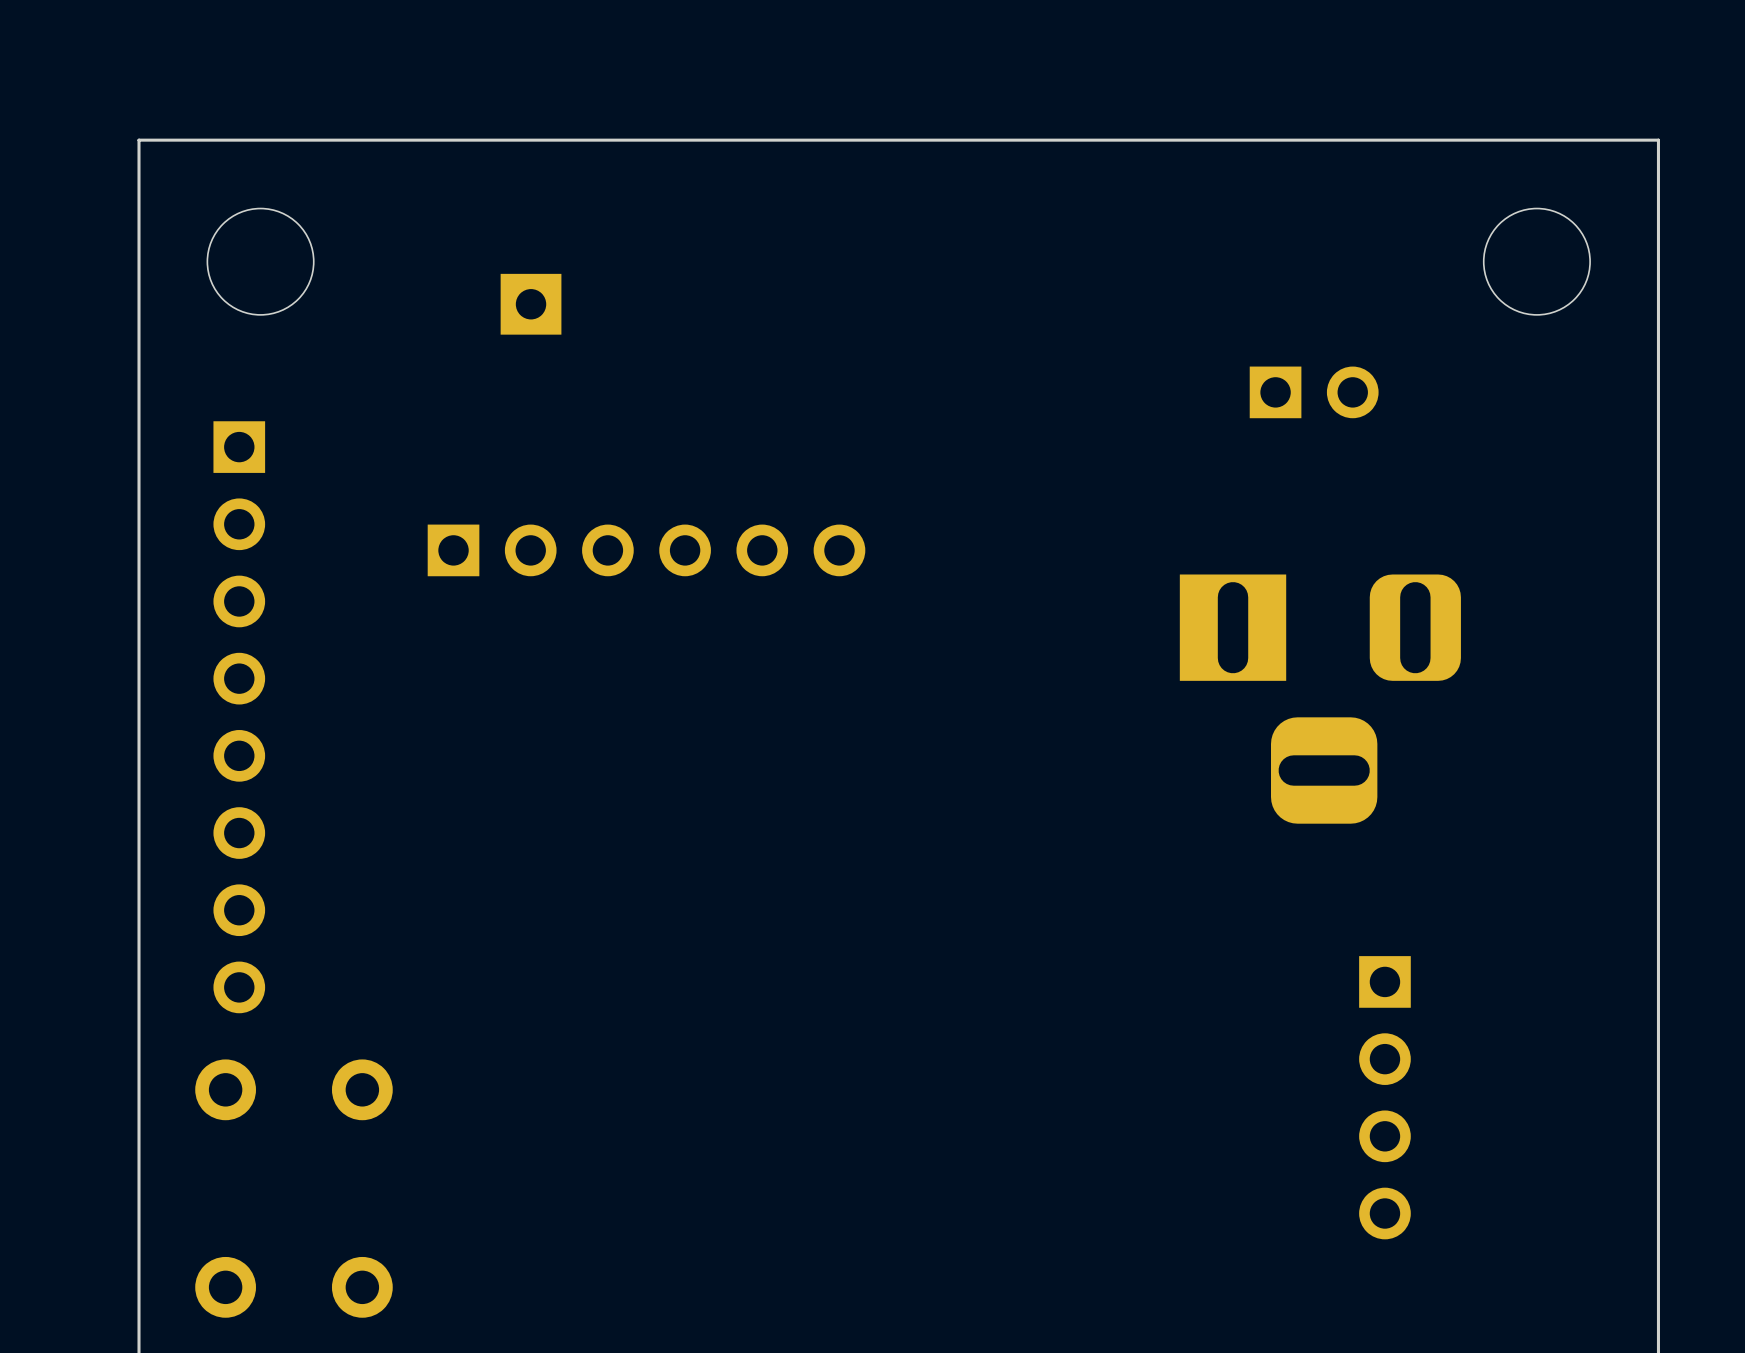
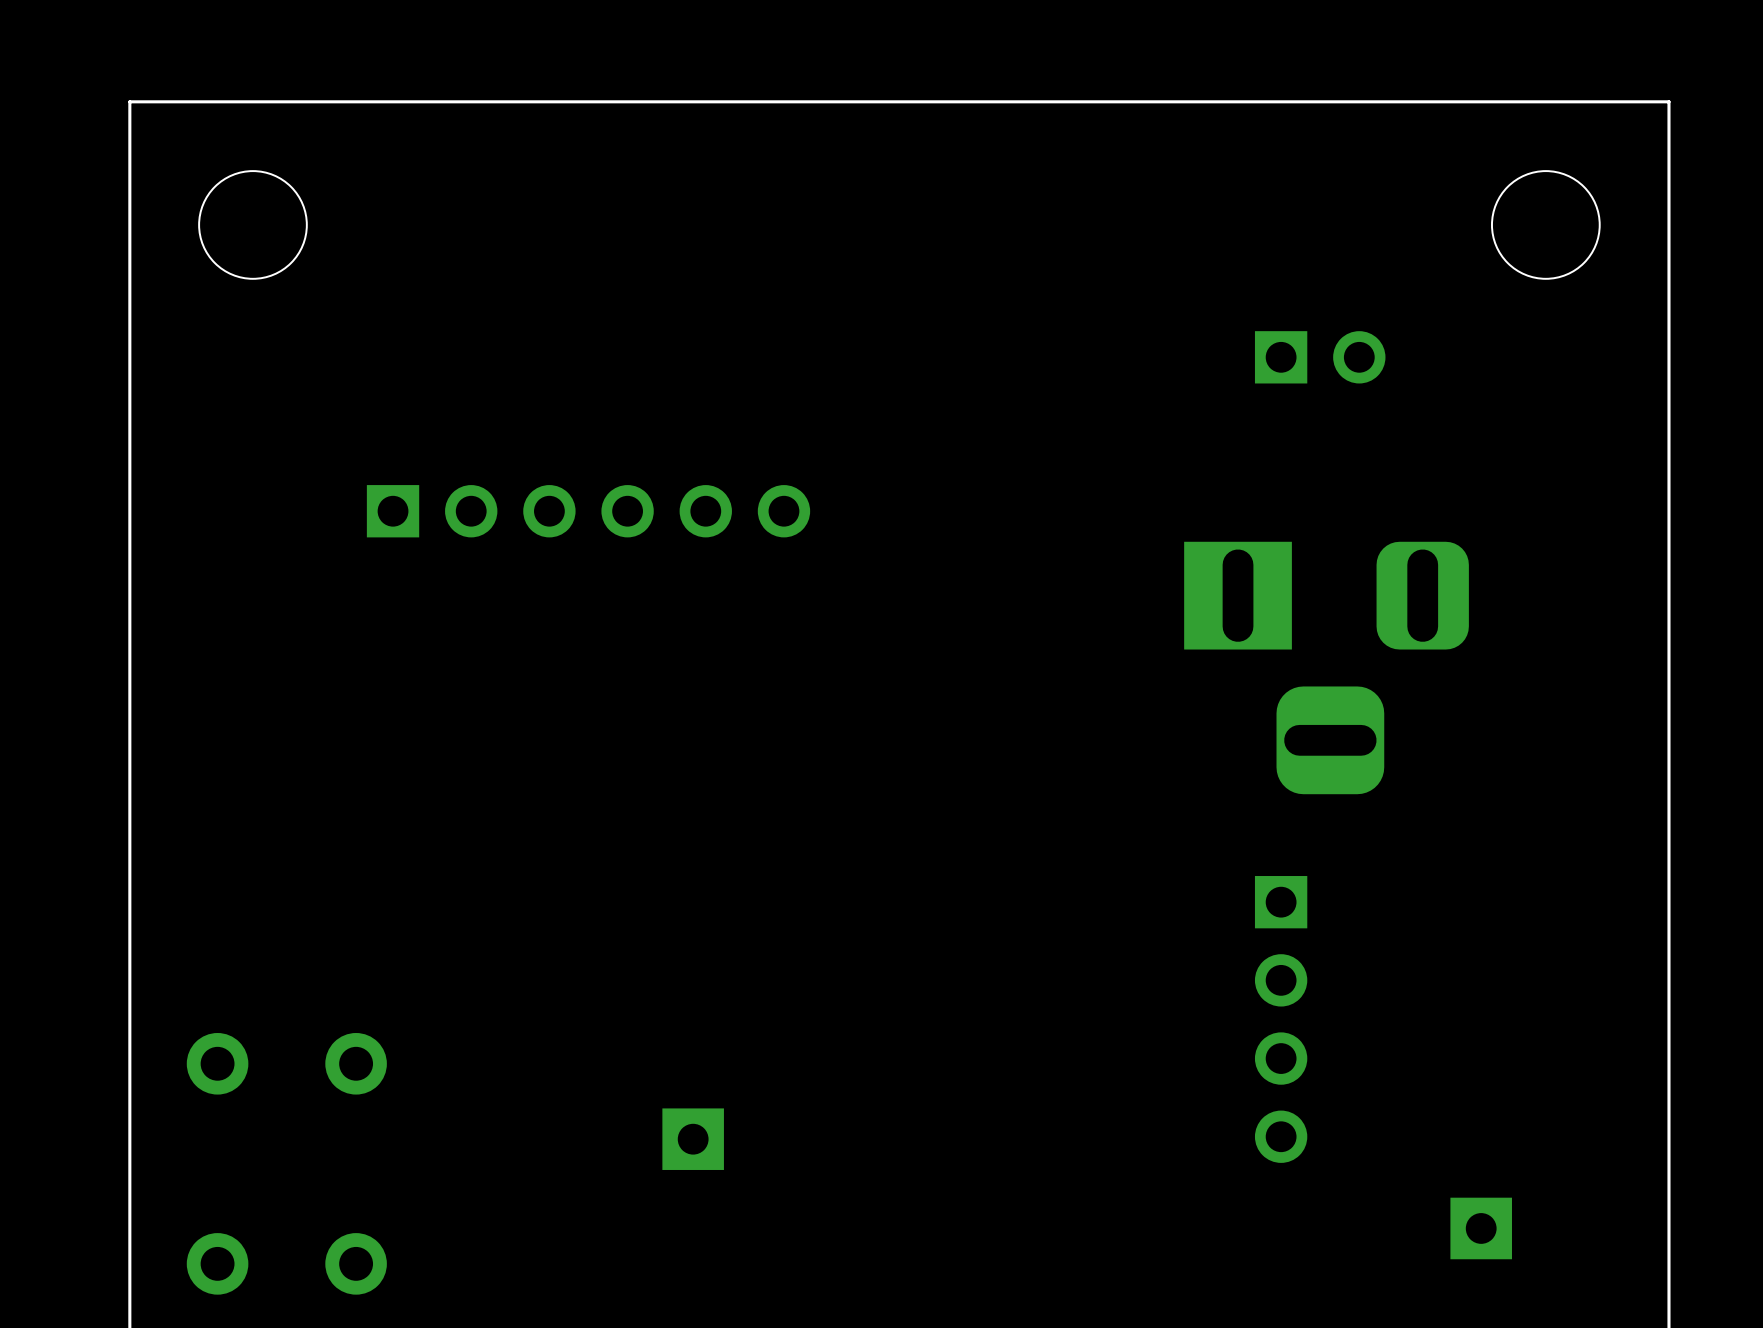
part: (531, 304) -> none
part position: (646, 550) -> (588, 511)
part: (239, 717) -> none
part position: (1384, 1097) -> (1281, 1019)
part: none -> (693, 1139)
part: none -> (1481, 1228)

